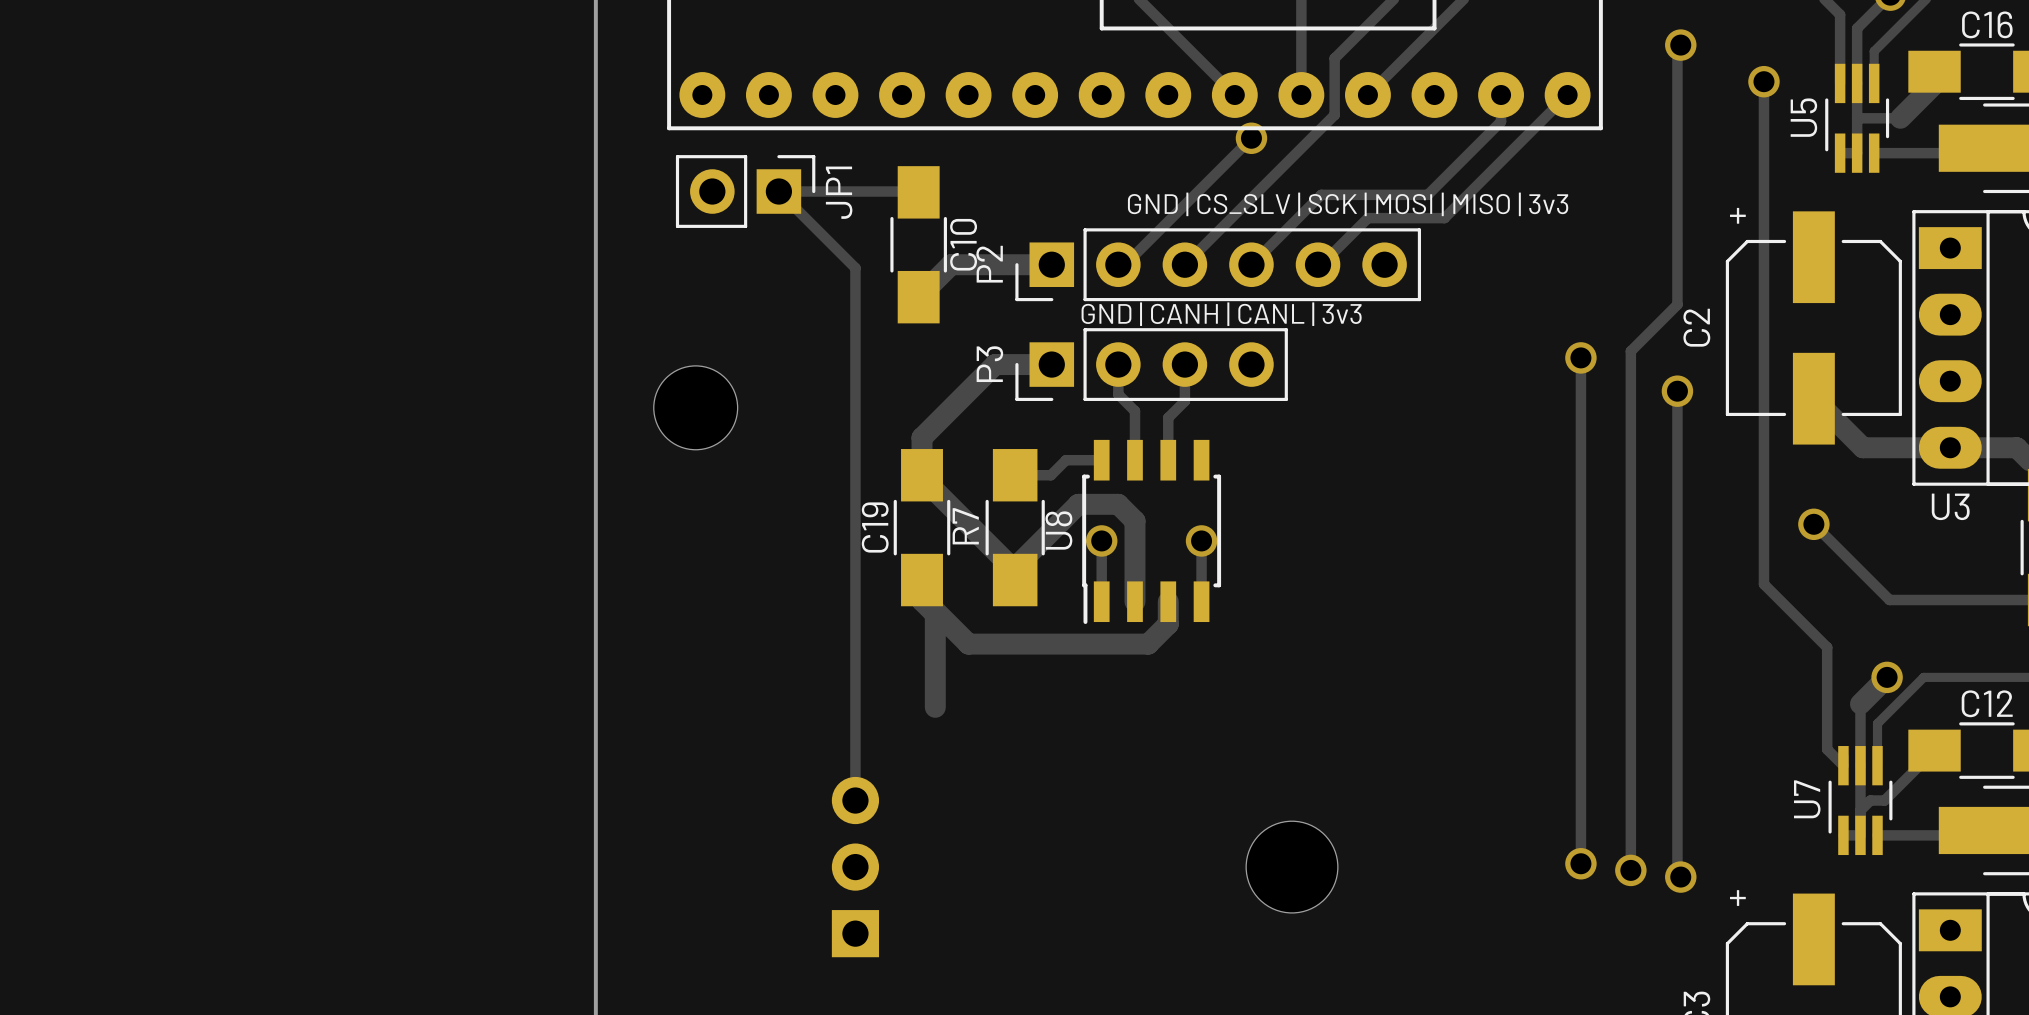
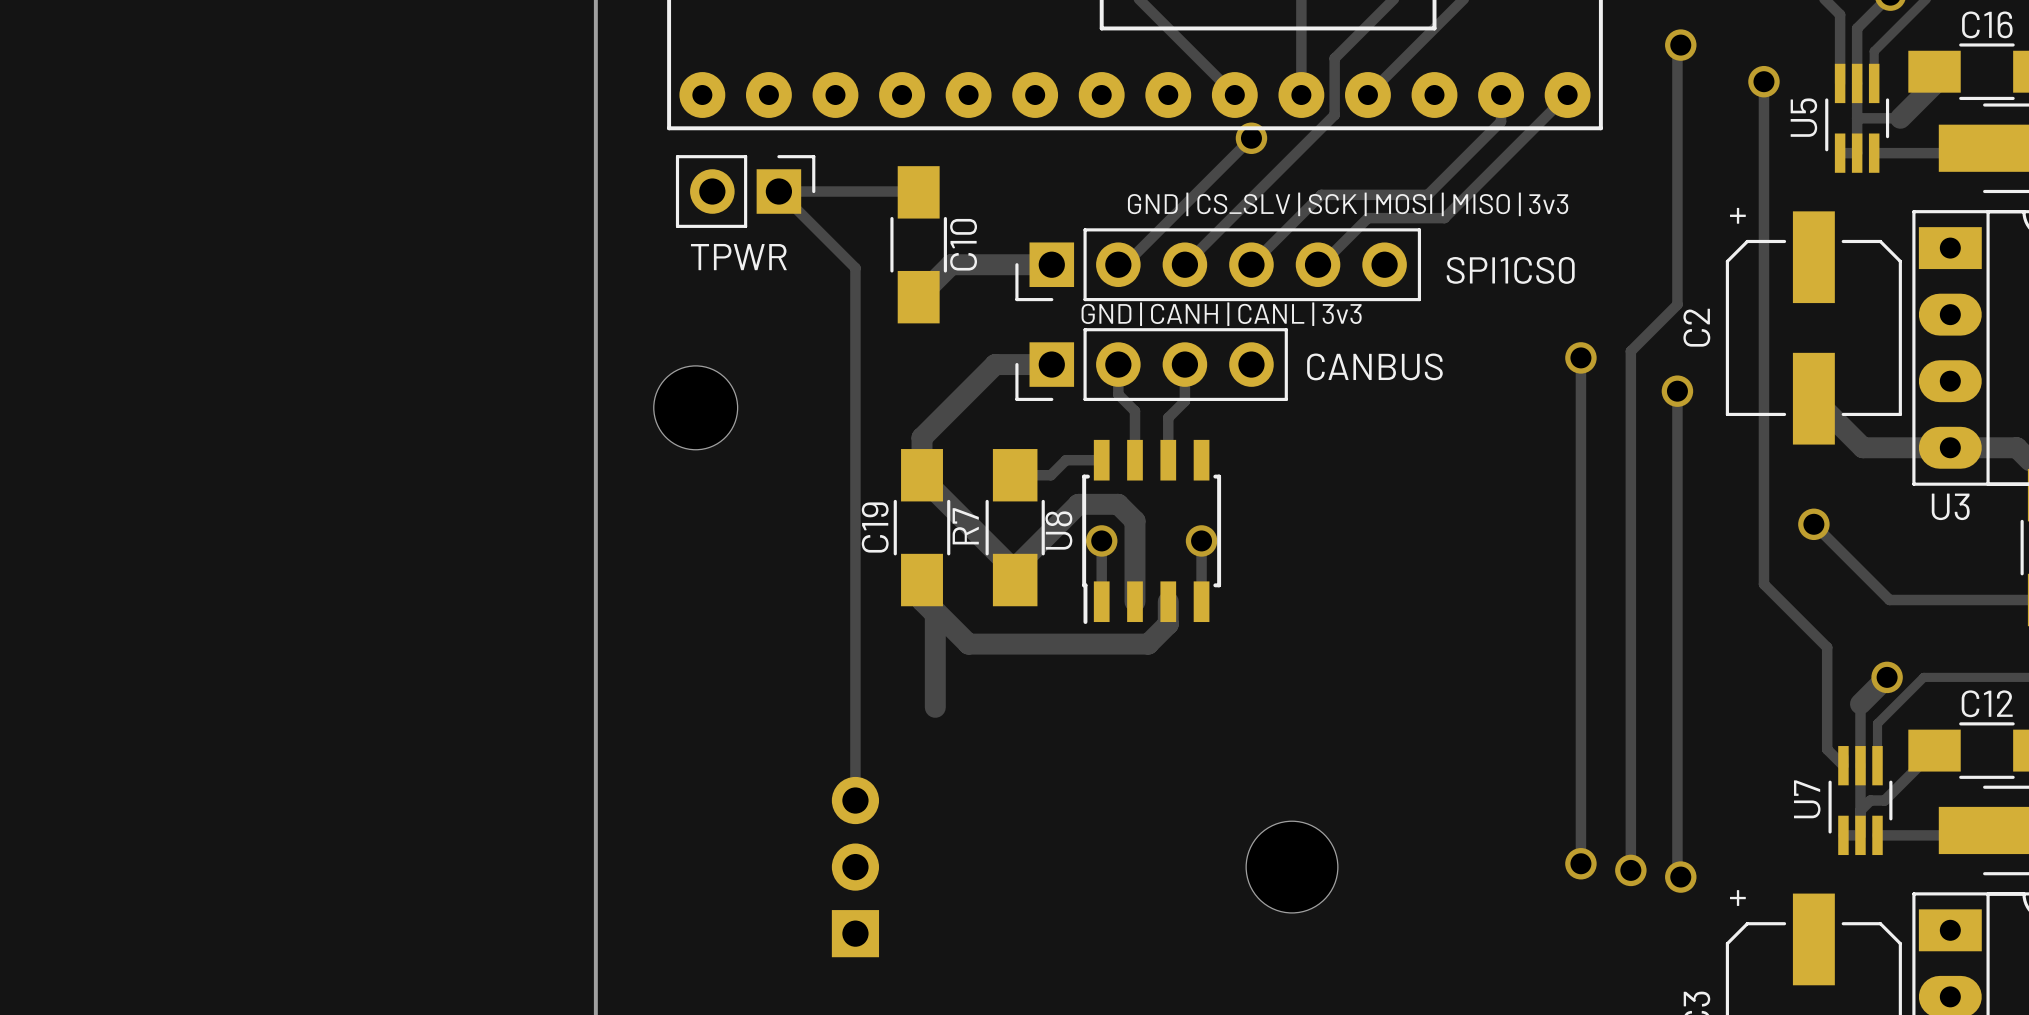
JP1 name: JP1 (839, 192) -> TPWR (738, 257)
P2 name: P2 (989, 264) -> SPI1CS0 (1510, 270)
P3 name: P3 (989, 364) -> CANBUS (1374, 366)

